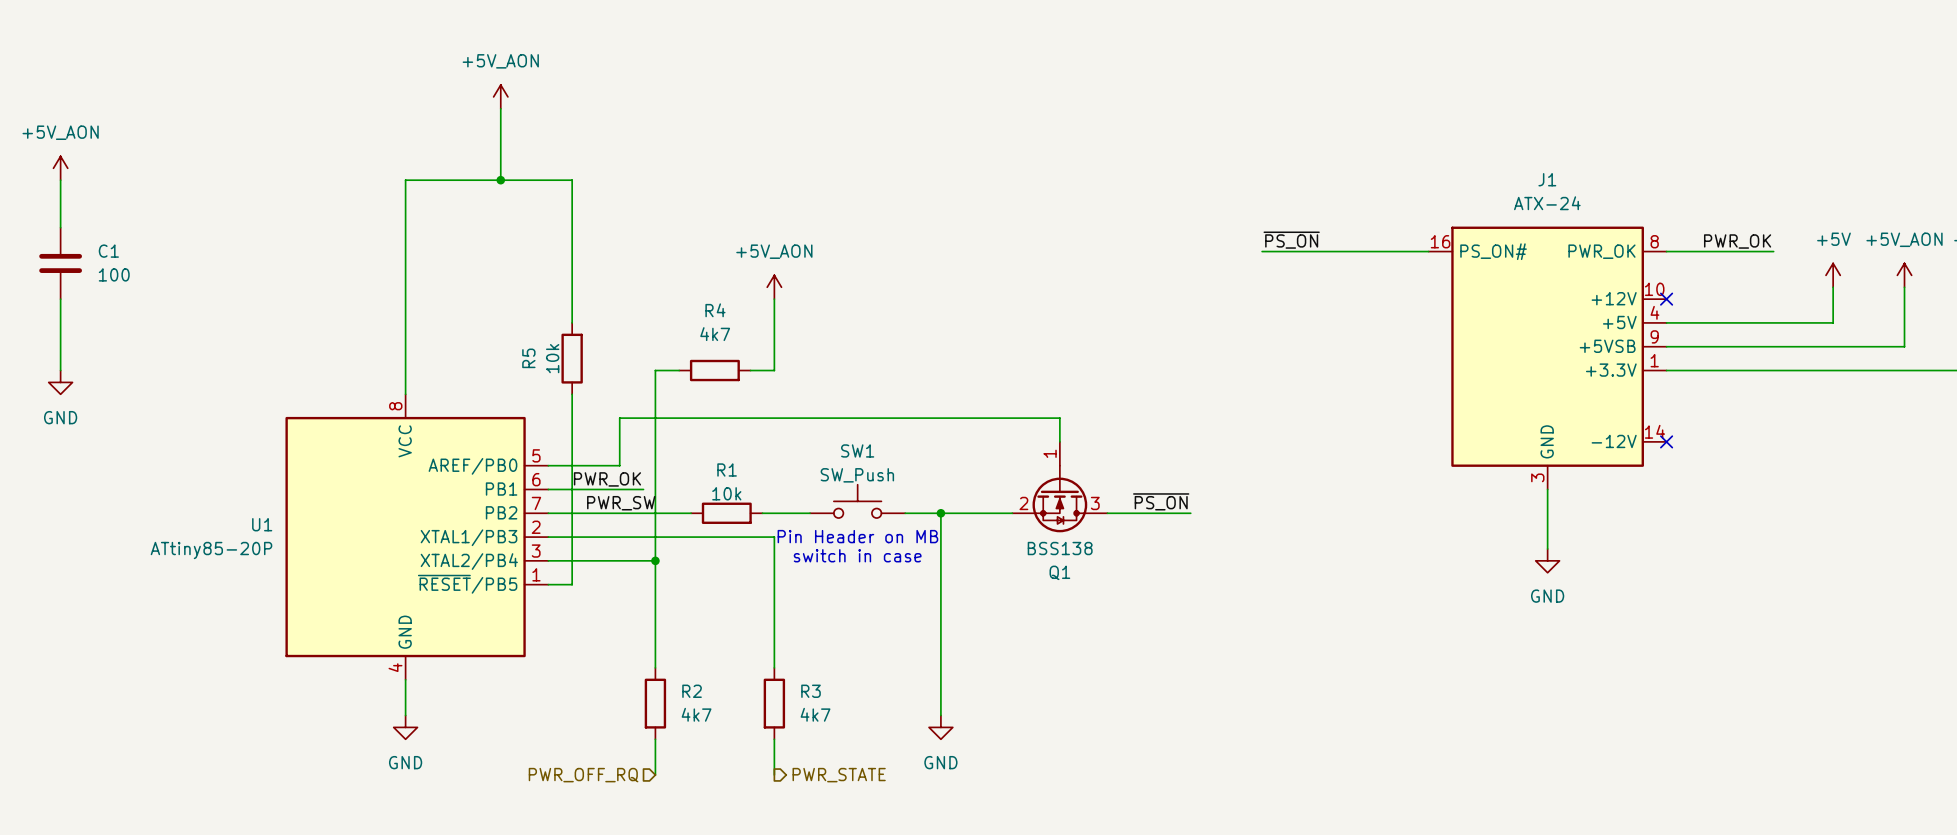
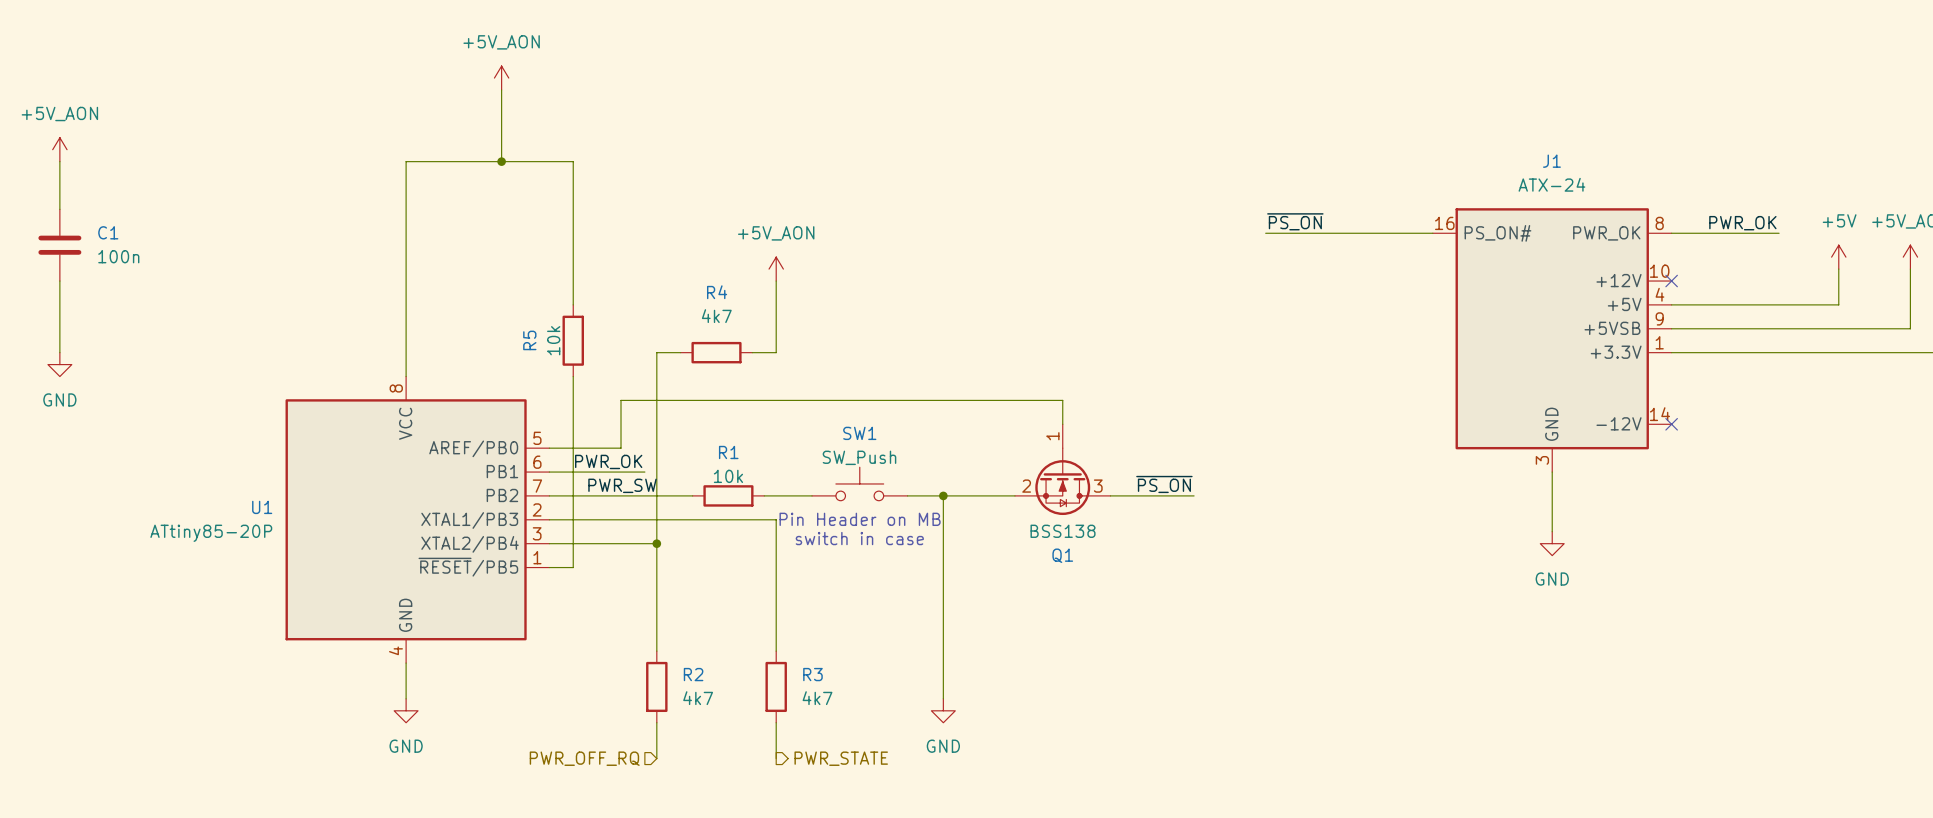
C1 value: 100 (114, 274) -> 100n (118, 256)

